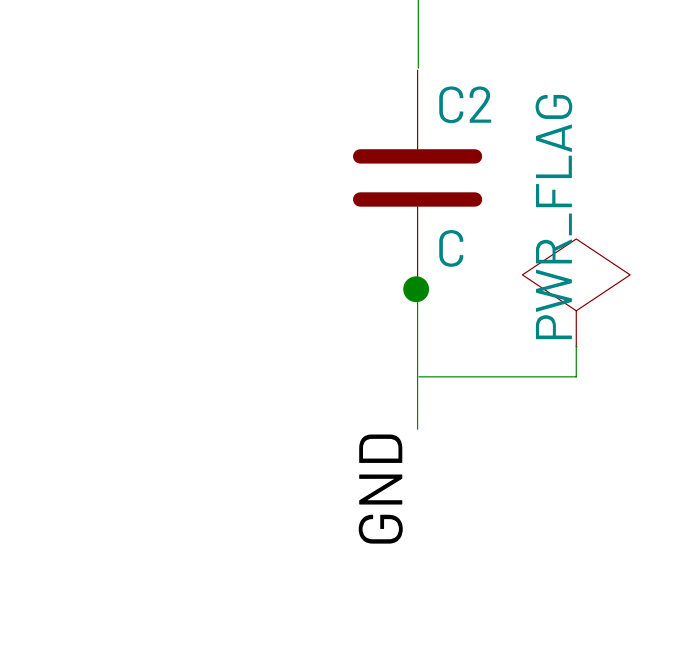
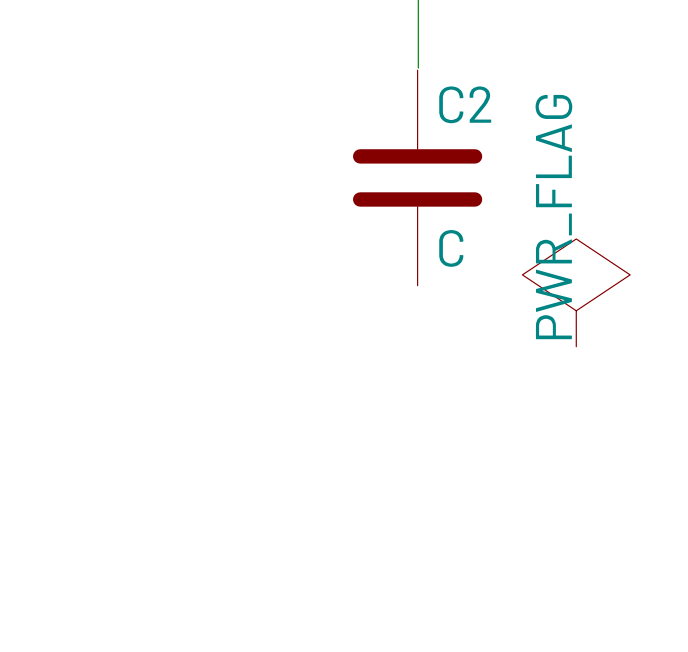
wire: (417, 285) (417, 429) -> none
junction: (416, 289) -> none
wire: (577, 346) (576, 376) (419, 376) -> none
label: GND (380, 489) -> none

